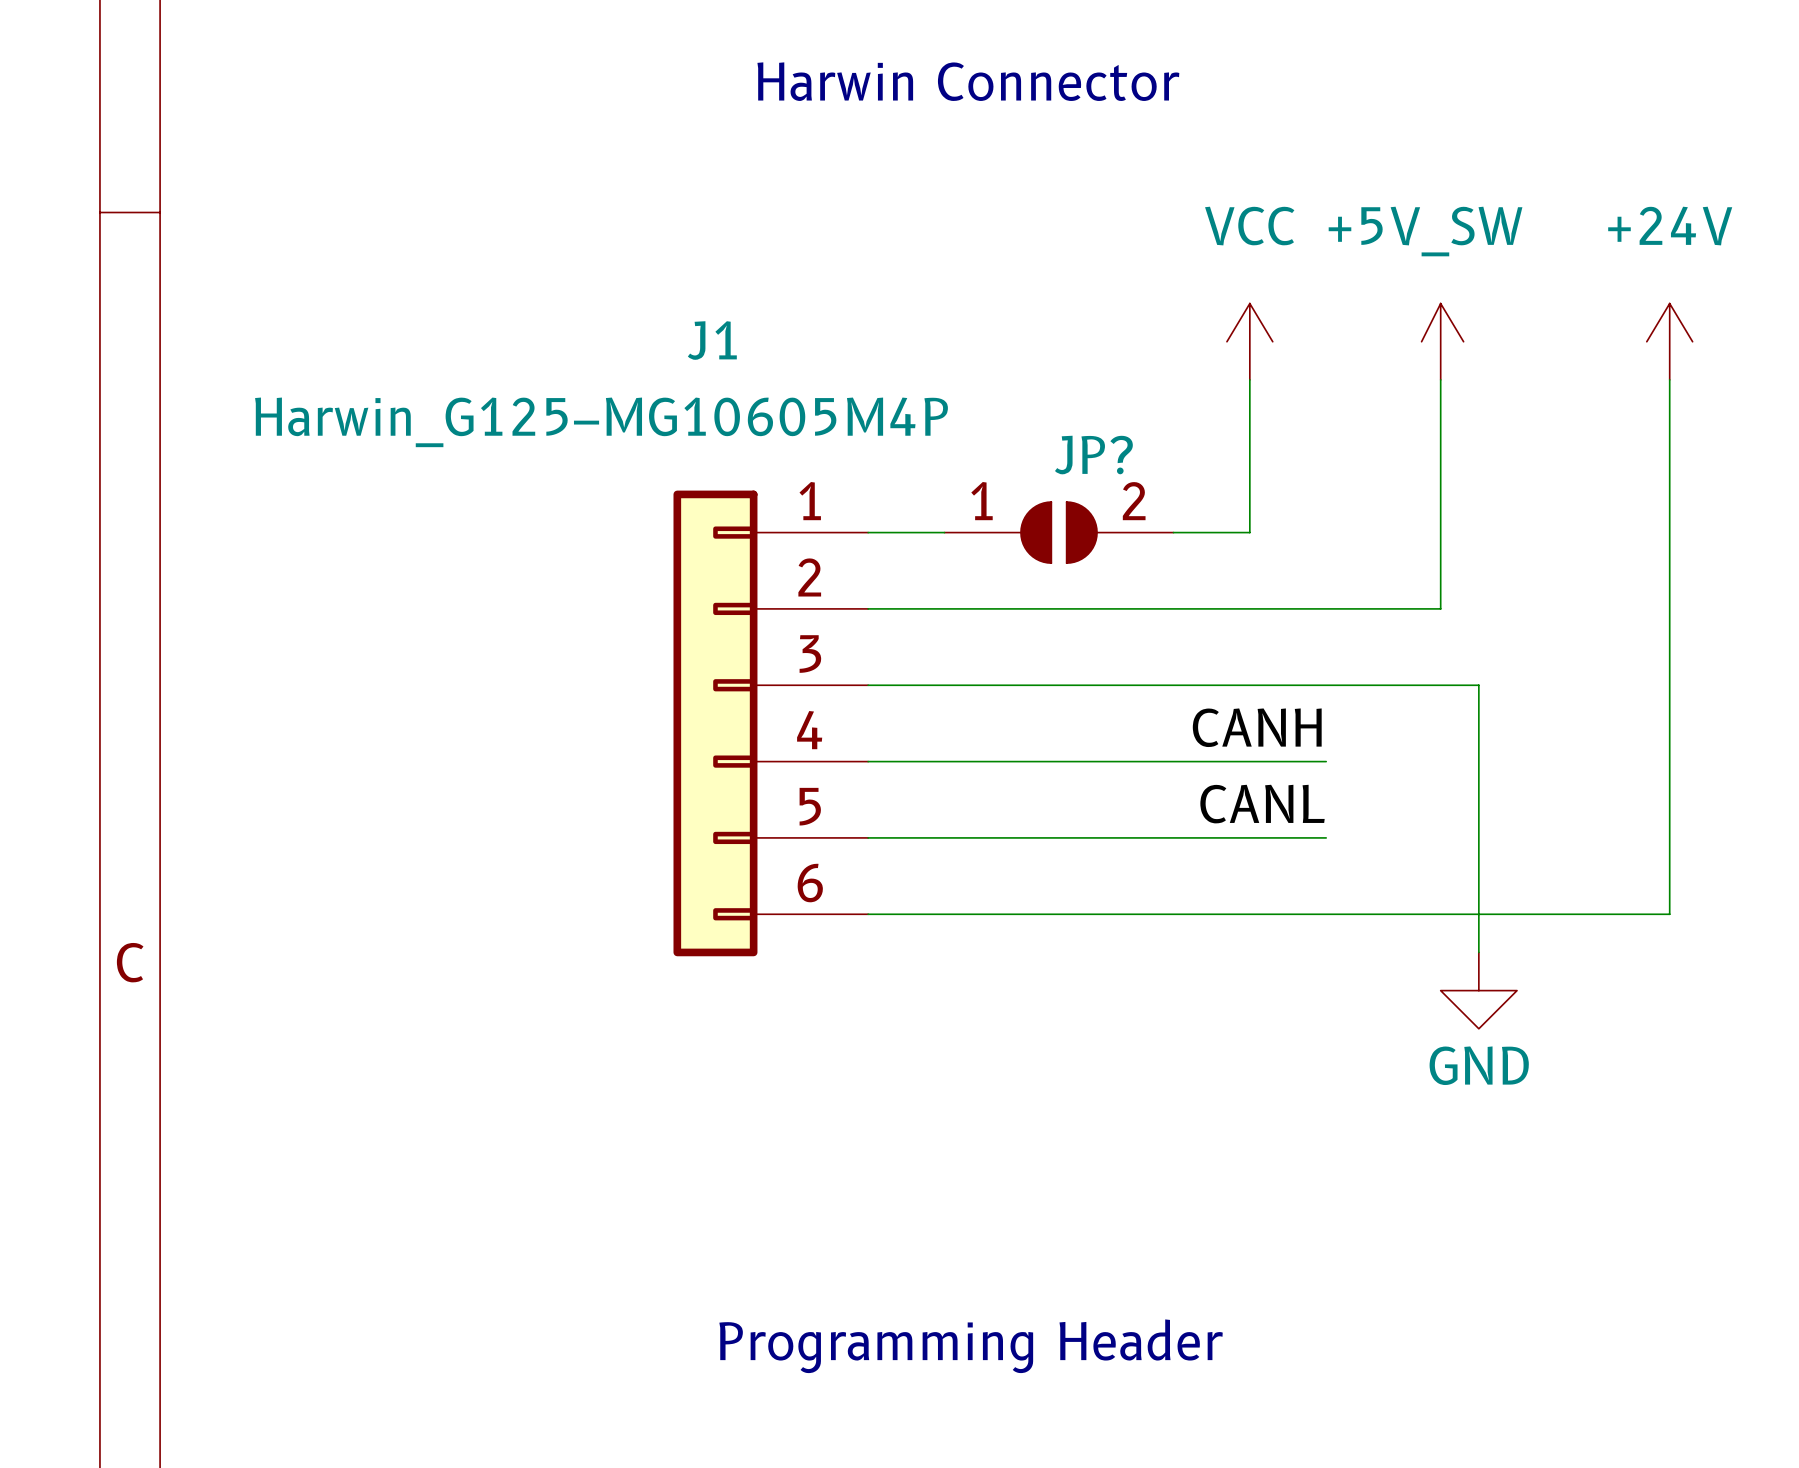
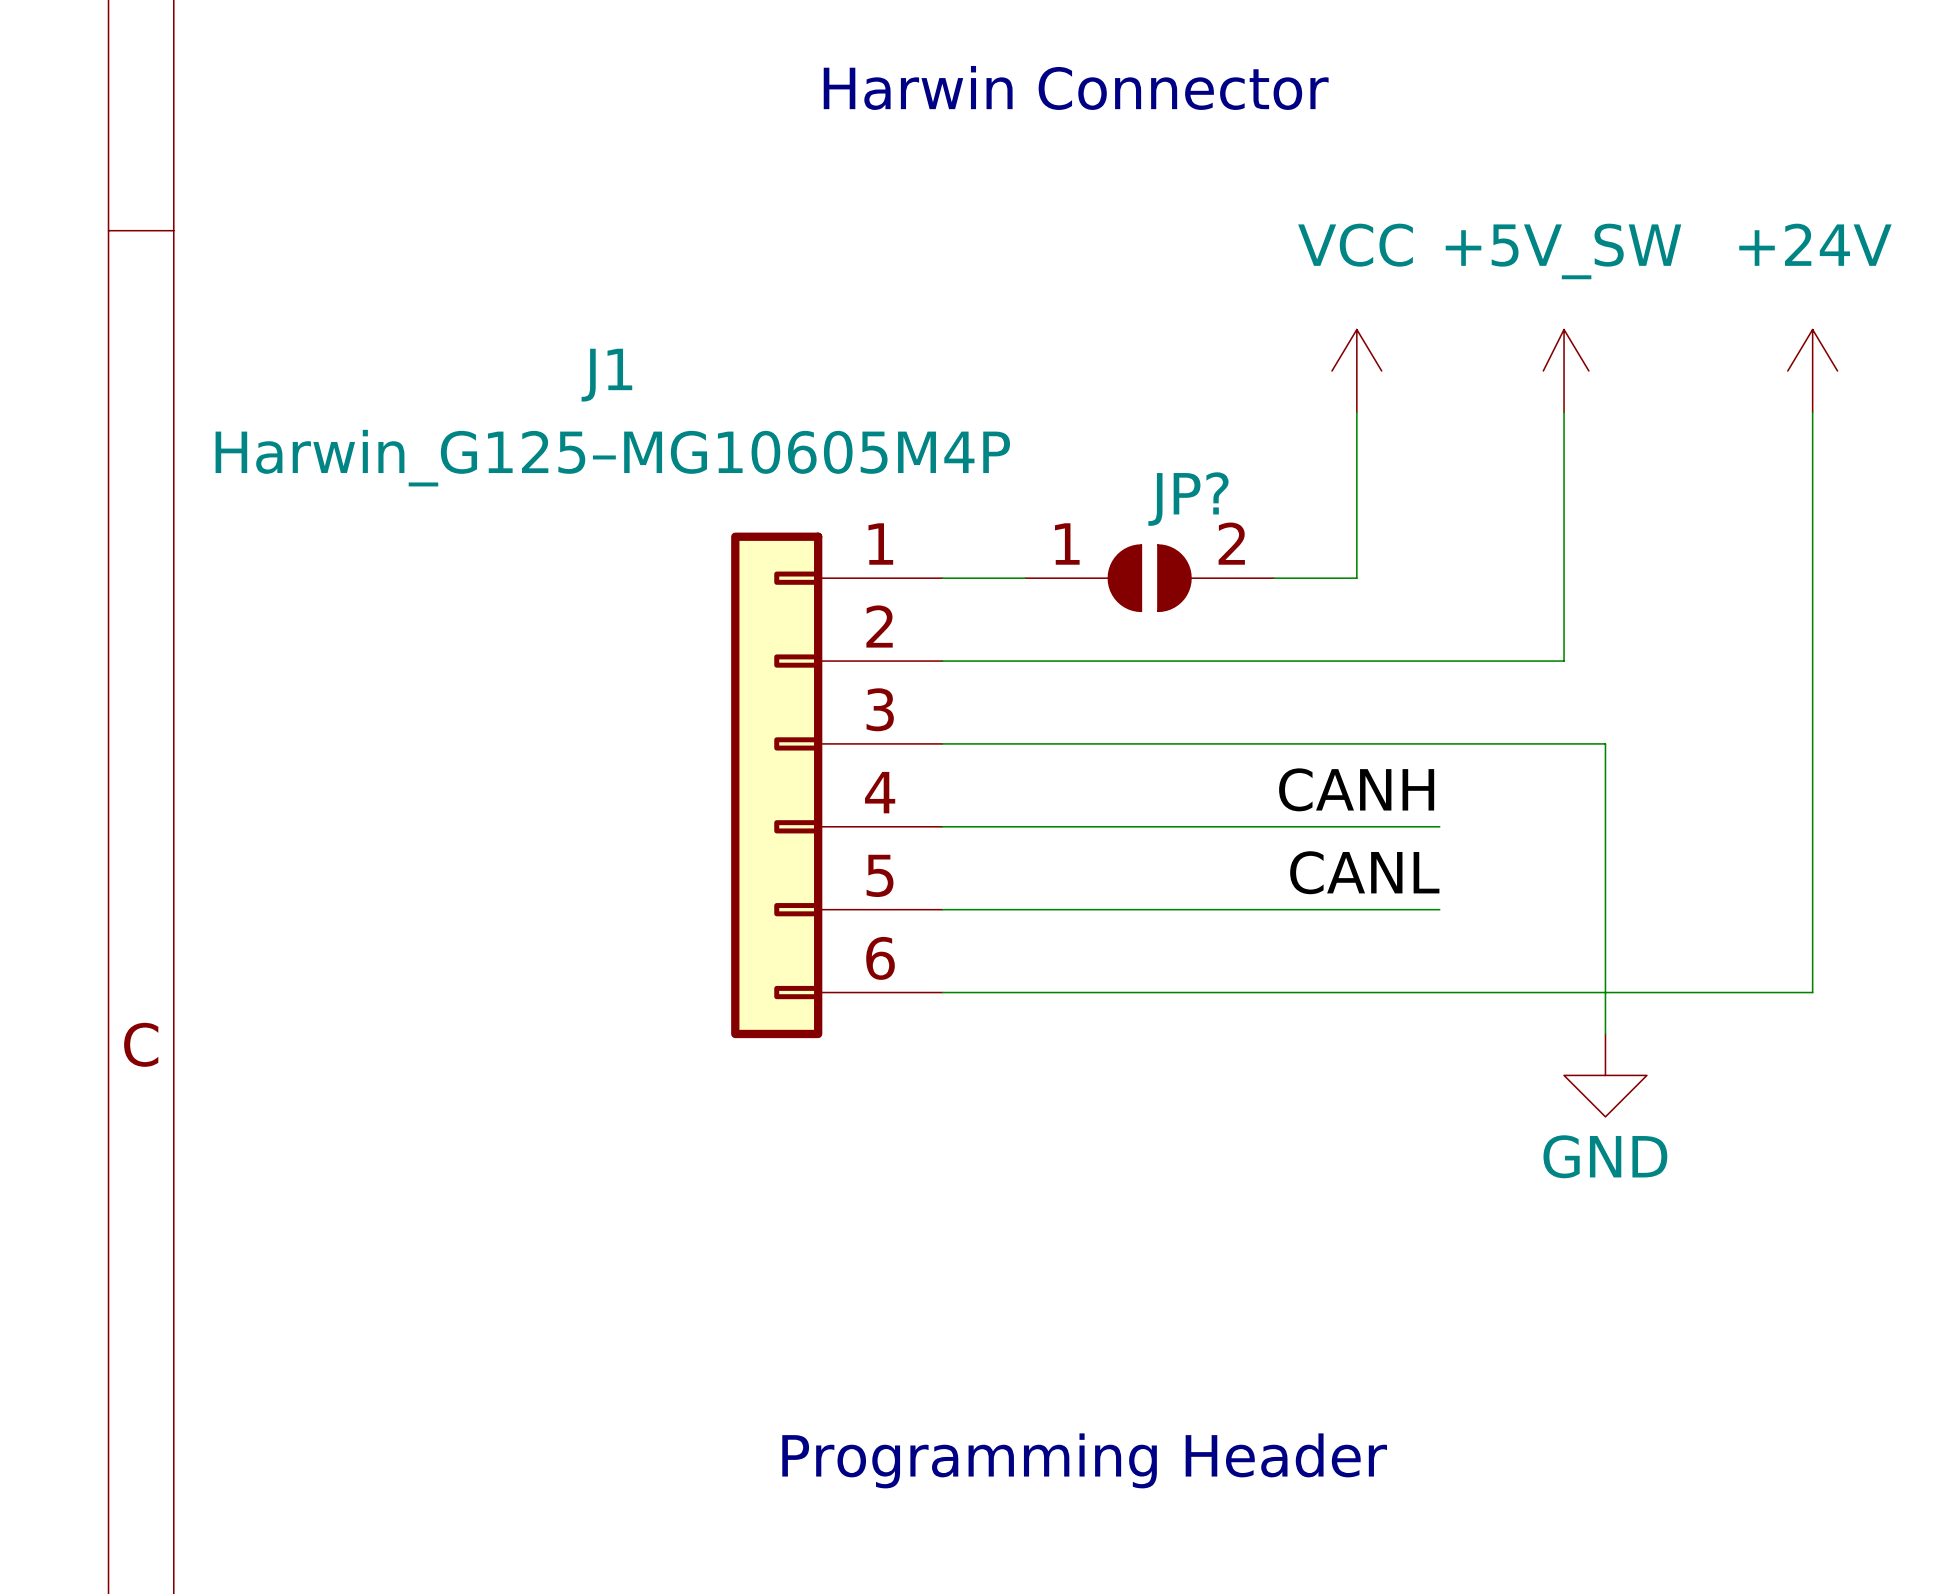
J1 name position: J1 (712, 340) -> J1 (606, 375)
J1 value position: Harwin_G125–MG10605M4P (601, 422) -> Harwin_G125–MG10605M4P (612, 458)

